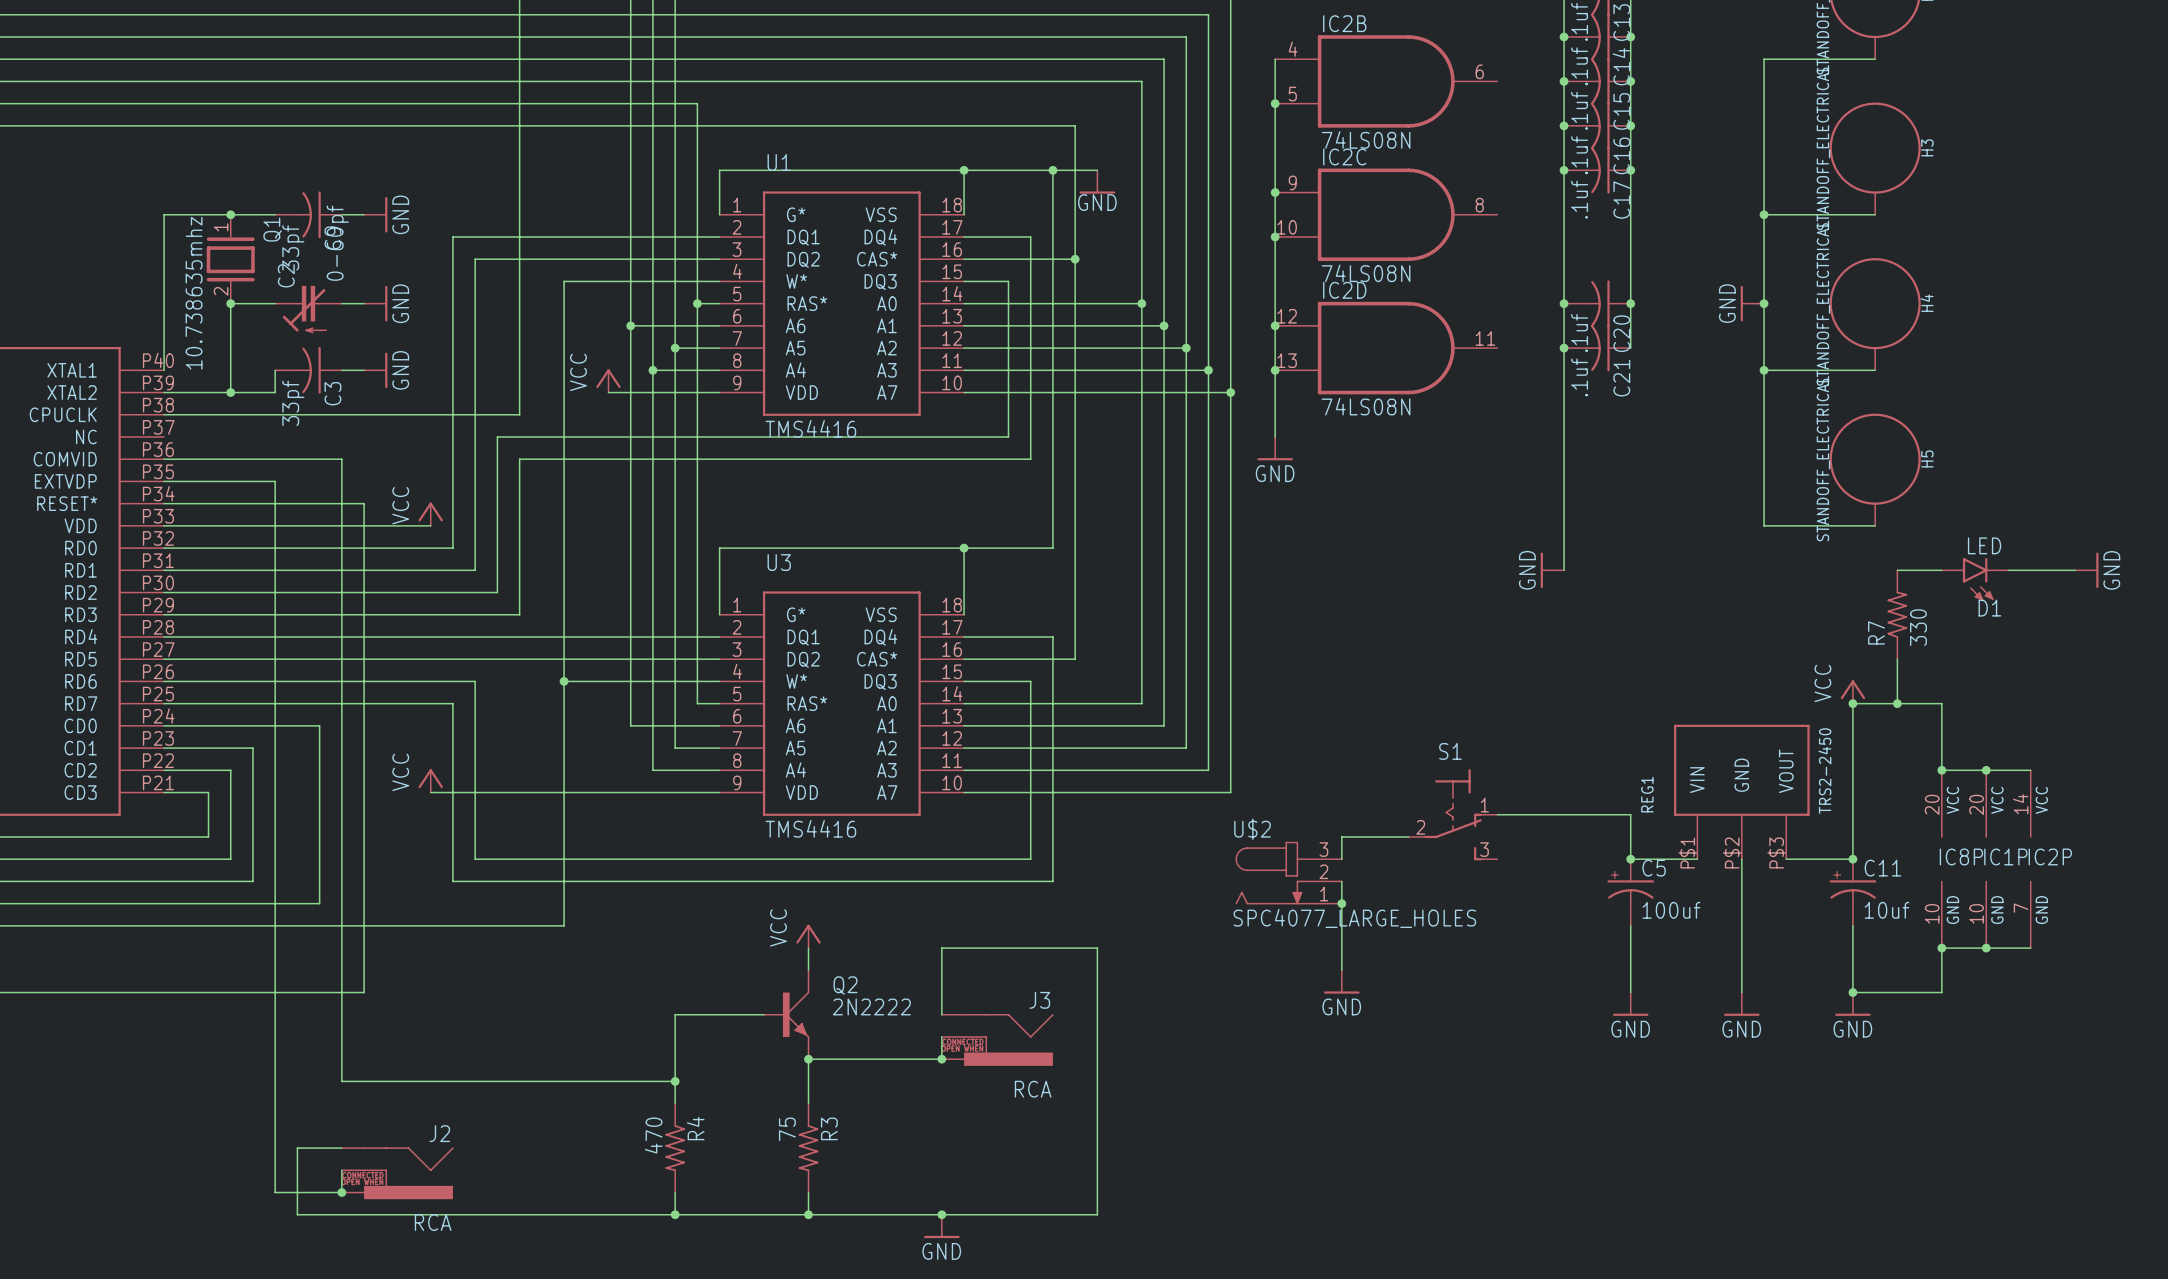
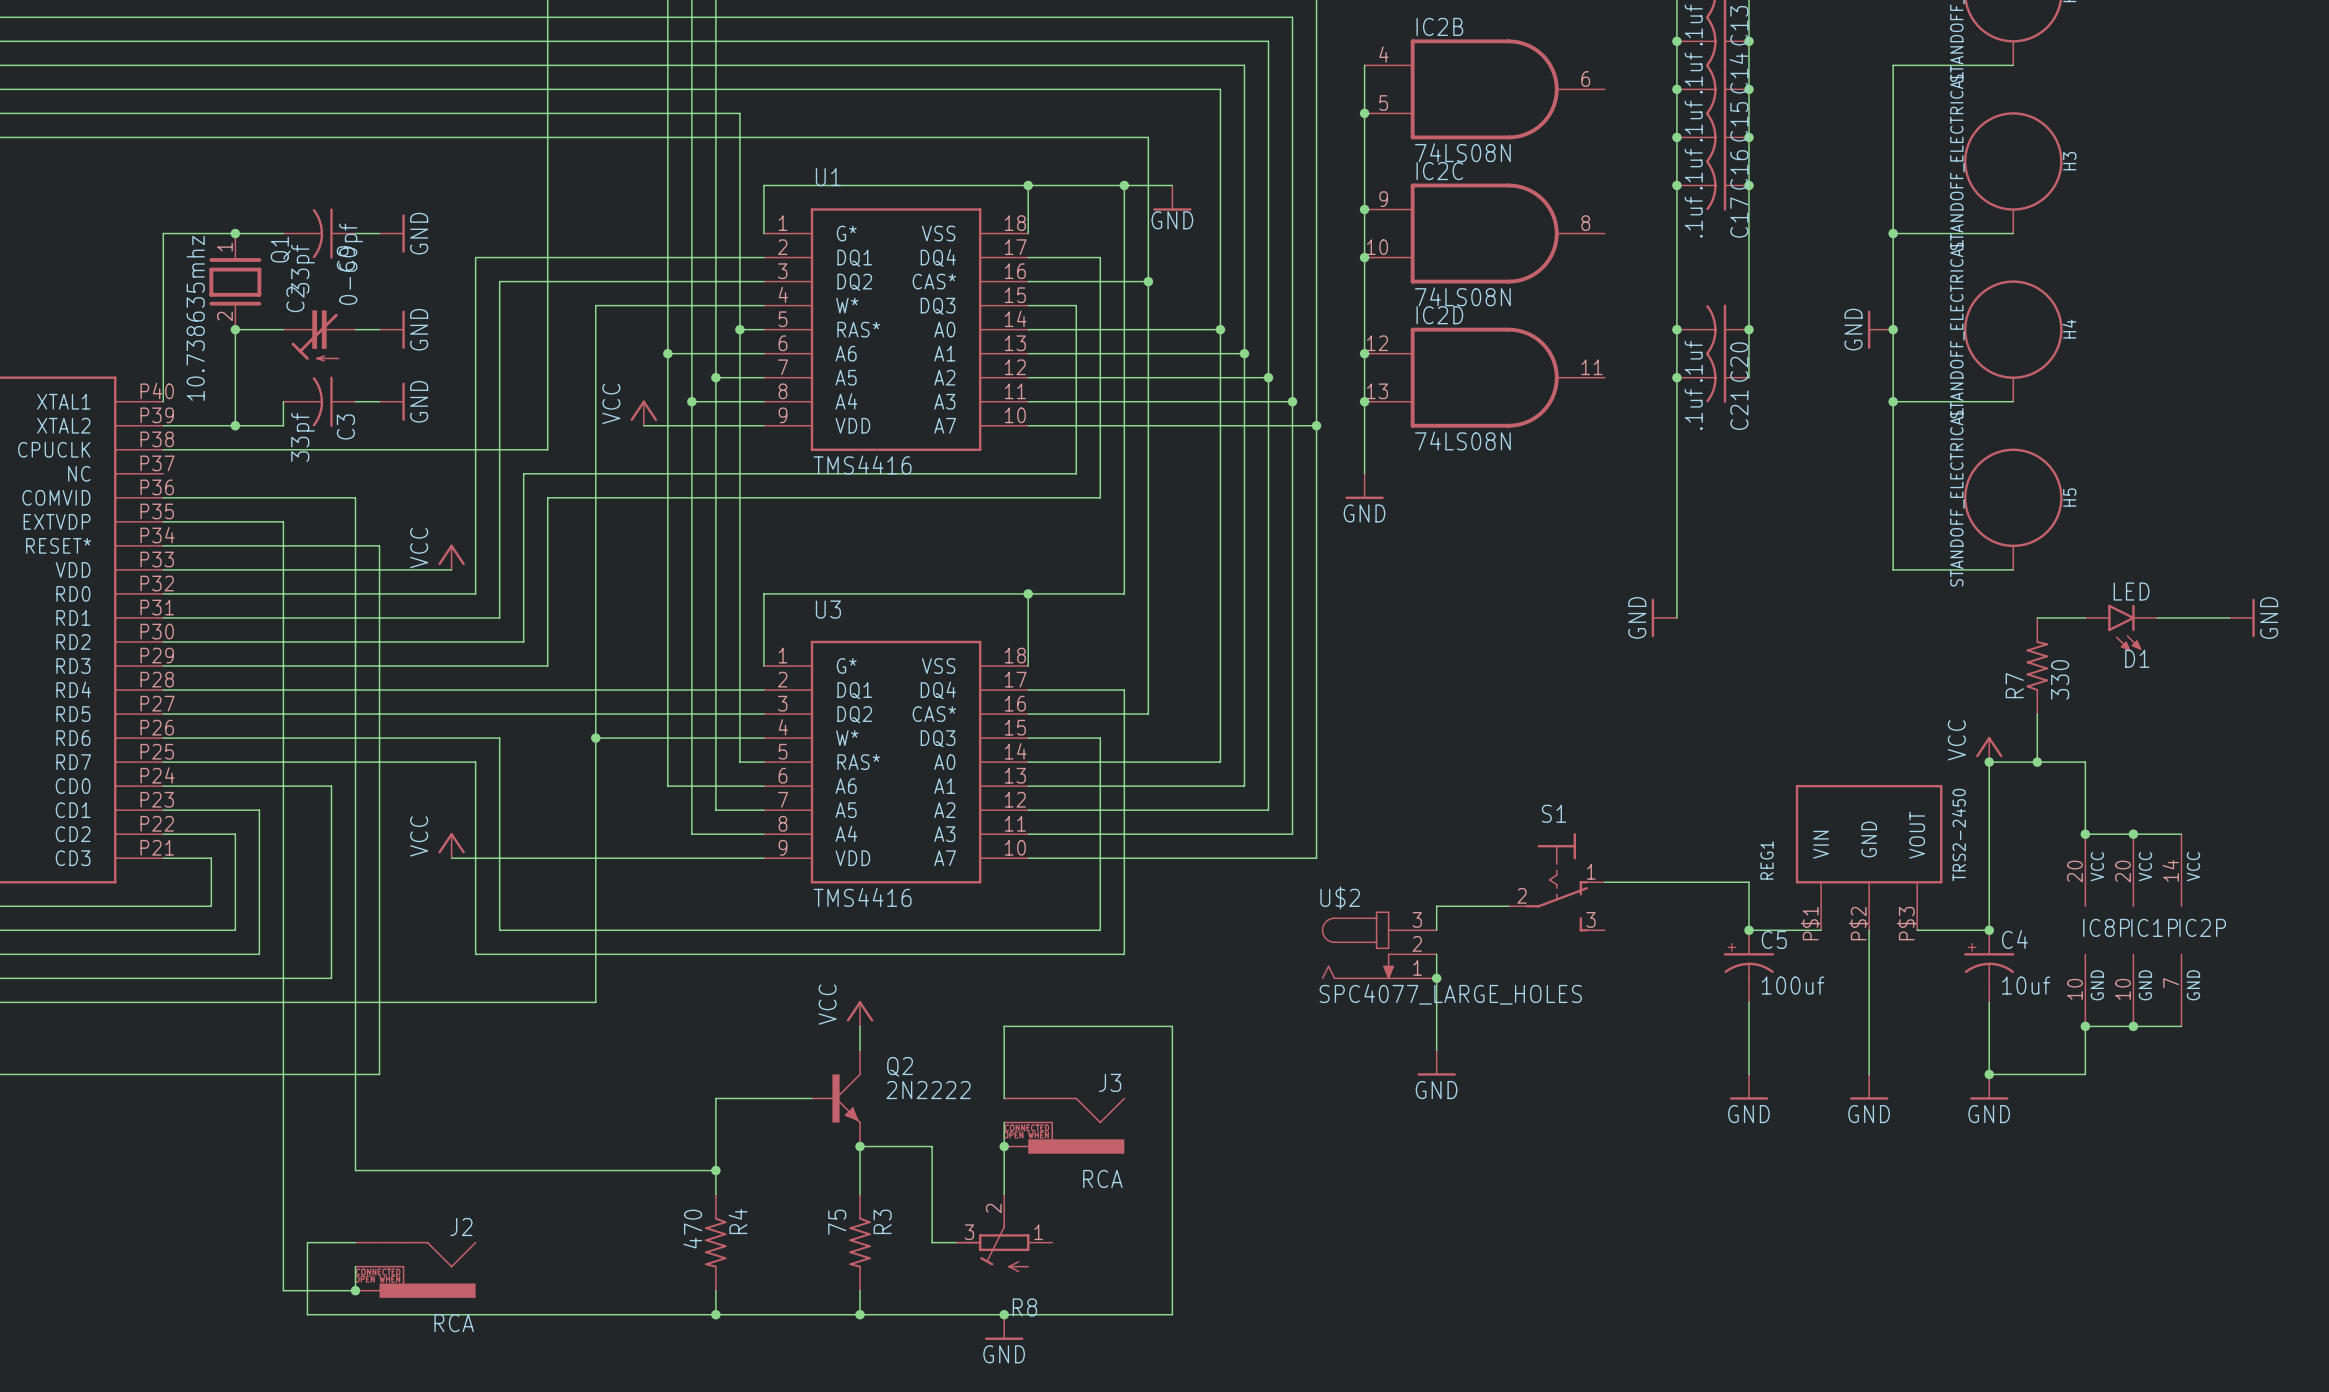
C11 name: C11 (1882, 868) -> C4 (2014, 939)
wire: (875, 1059) (941, 1059) -> (1004, 1194) (1004, 1146)
wire: none -> (932, 1146) (932, 1242) (956, 1242)
R8: none -> (1003, 1233)

